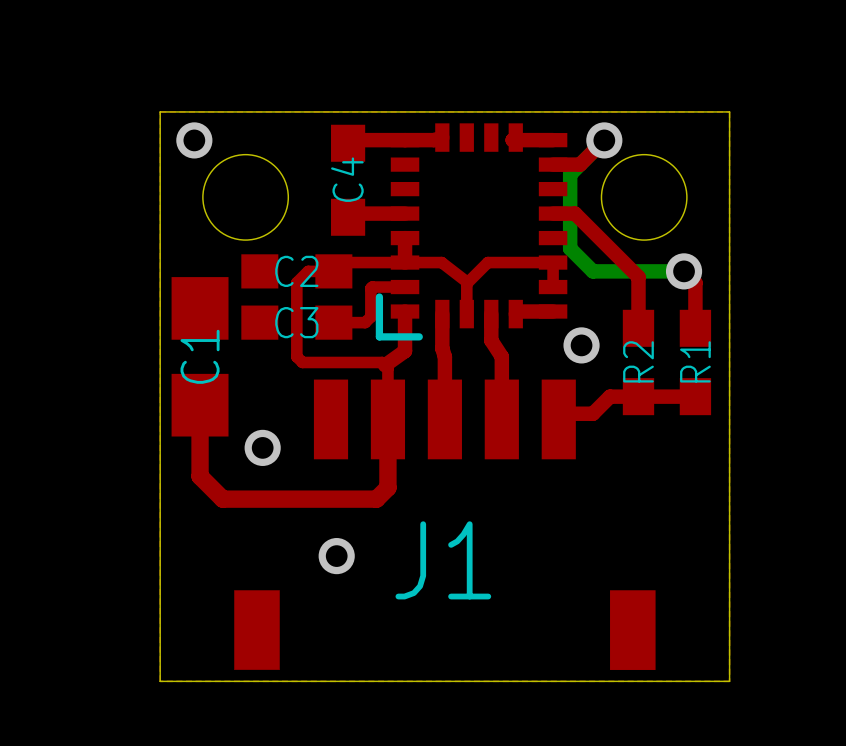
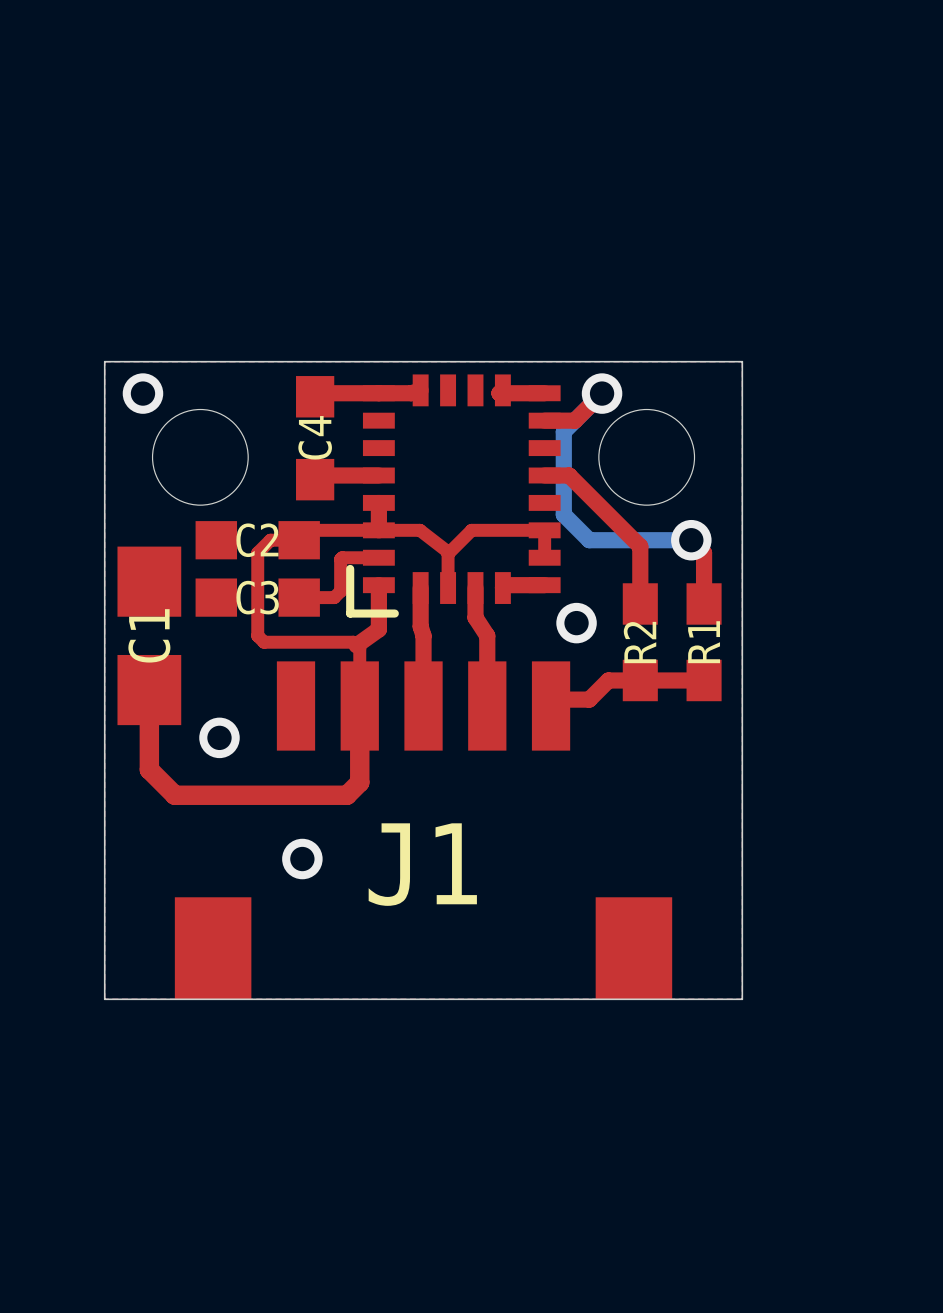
J1 footprint: [234, 379, 656, 670] -> [174, 661, 673, 1000]

